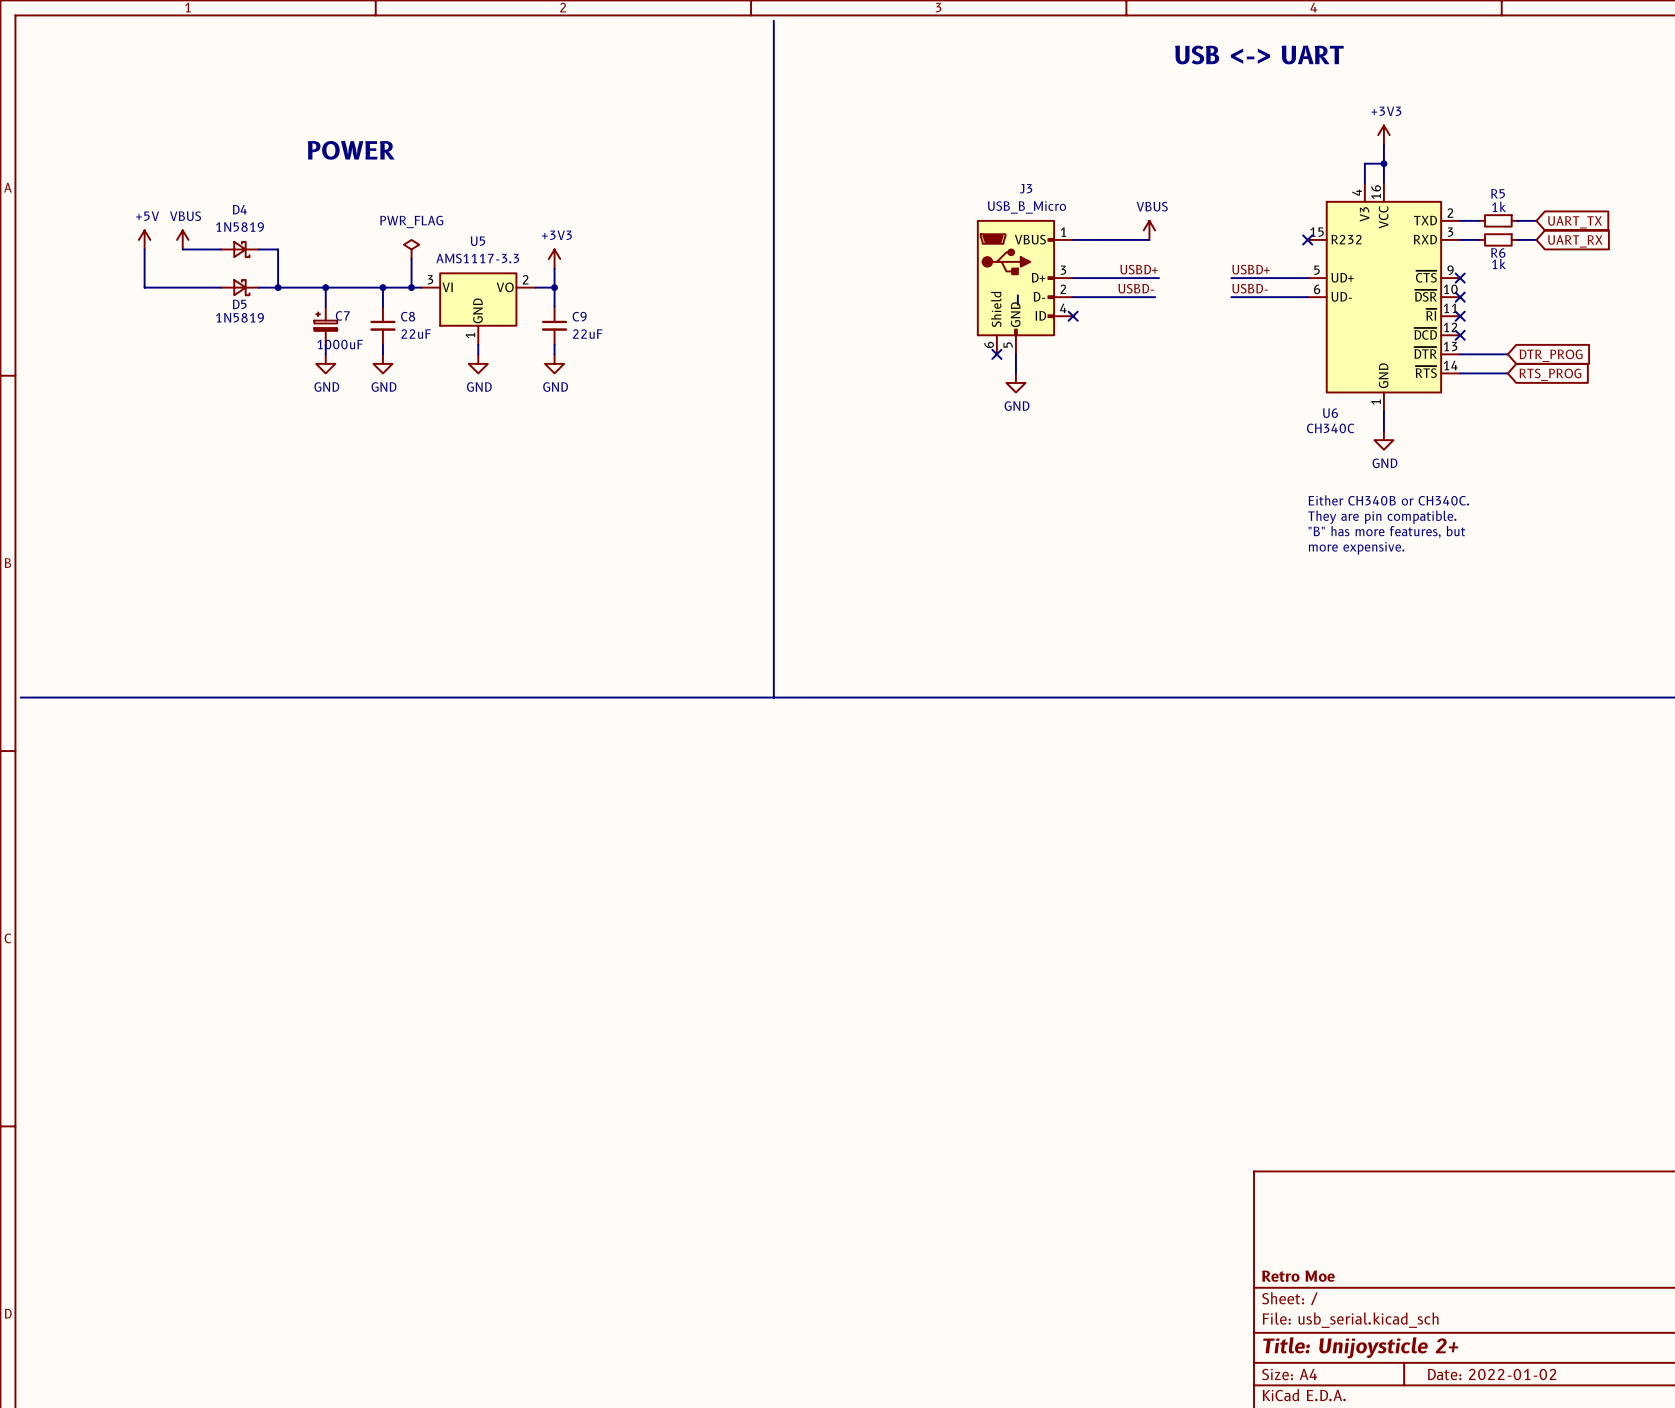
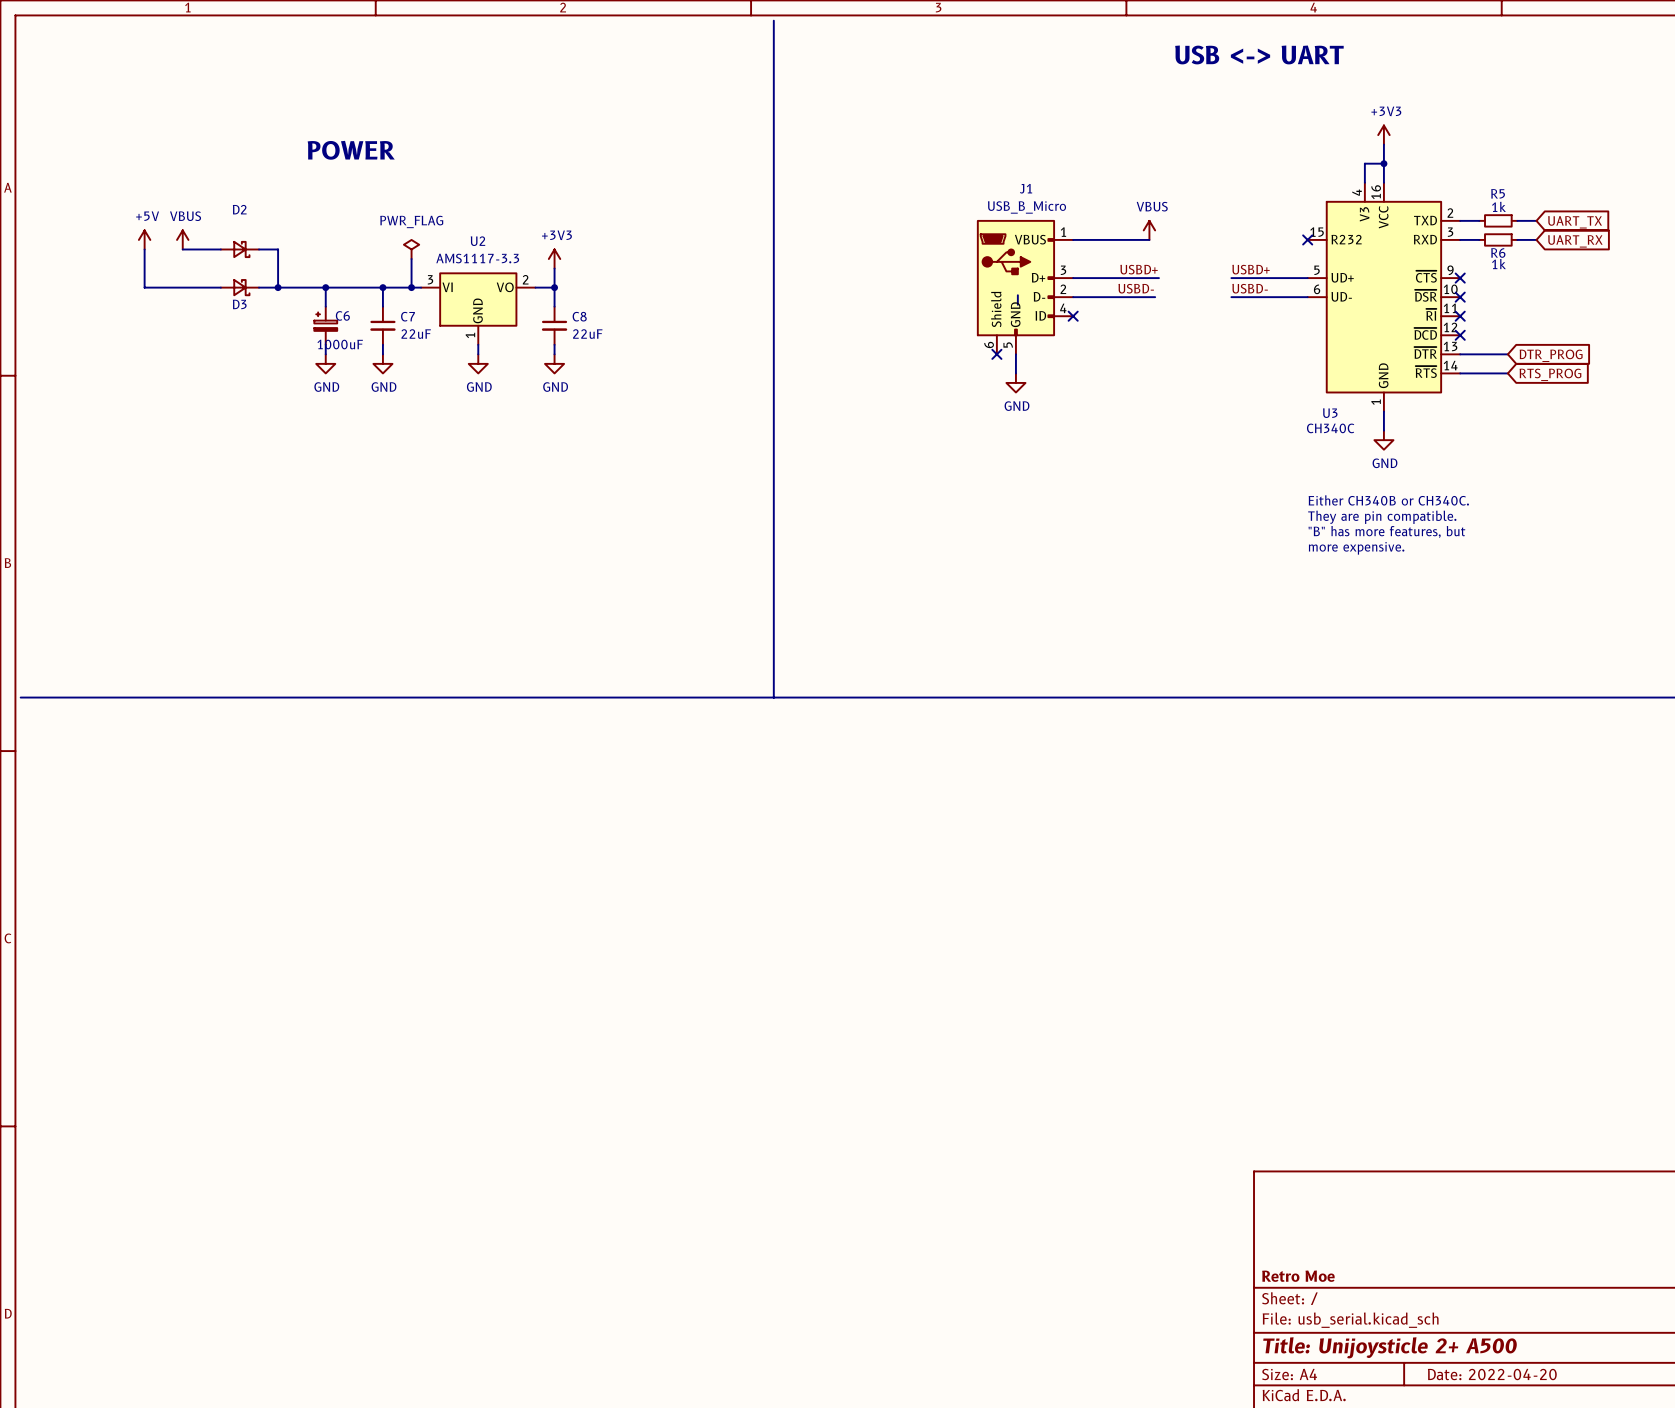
J3 name: J3 (1026, 188) -> J1 (1026, 188)
D4 name: D4 (239, 209) -> D2 (239, 209)
D4 value: 1N5819 (240, 227) -> none
U5 name: U5 (477, 241) -> U2 (477, 241)
D5 name: D5 (239, 304) -> D3 (239, 304)
C7 name: C7 (342, 315) -> C6 (342, 315)
C8 name: C8 (408, 316) -> C7 (407, 316)
C9 name: C9 (579, 316) -> C8 (579, 316)
D5 value: 1N5819 (240, 317) -> none
U6 name: U6 (1330, 413) -> U3 (1330, 413)
title block: Title: Unijoysticle 2+ (1360, 1347) -> Title: Unijoysticle 2+ A500 (1390, 1347)
title block: Date: 2022-01-02 (1492, 1374) -> Date: 2022-04-20 (1492, 1374)

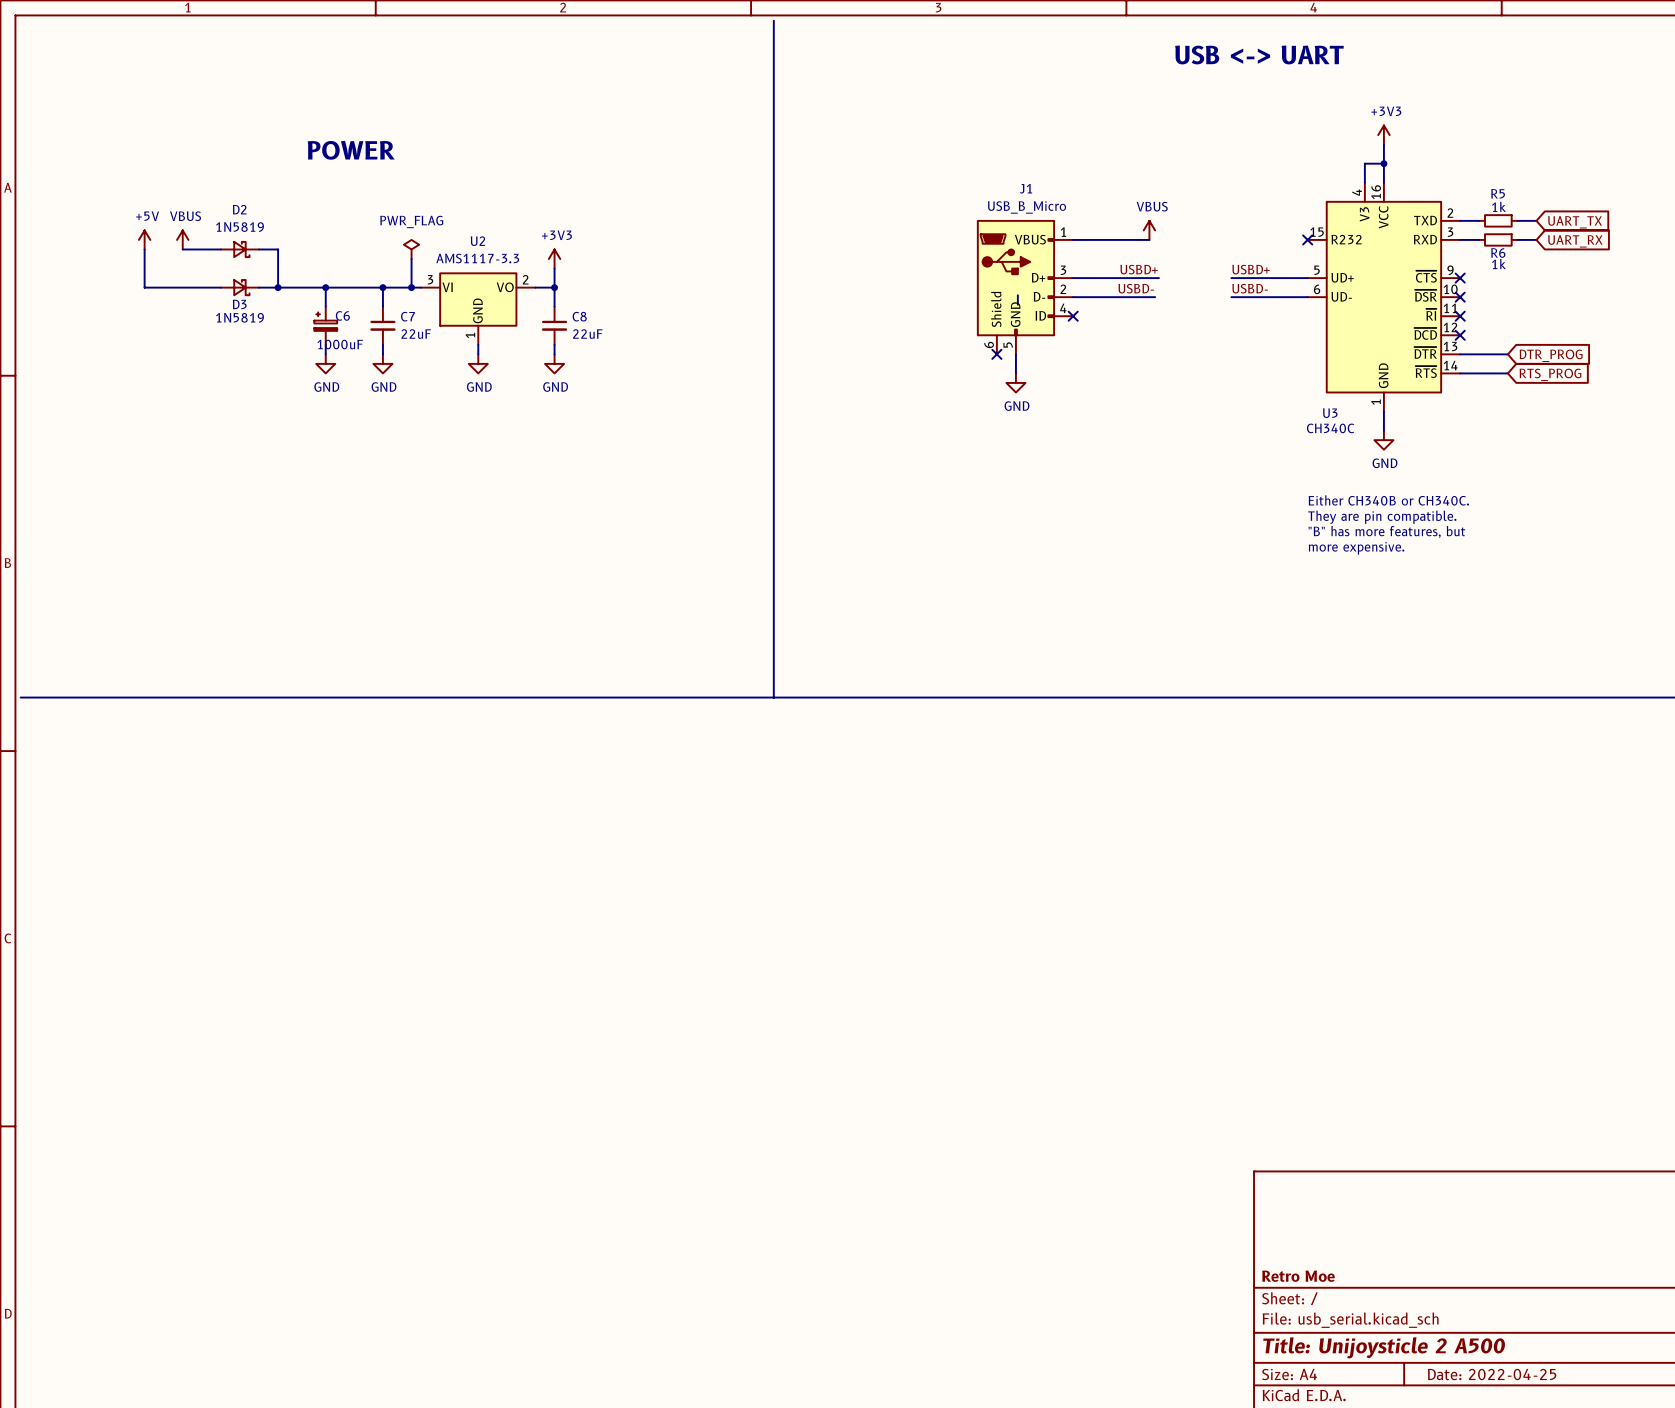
D2 value: none -> 1N5819 (240, 227)
D3 value: none -> 1N5819 (240, 317)
title block: Title: Unijoysticle 2+ A500 (1390, 1347) -> Title: Unijoysticle 2 A500 (1384, 1347)
title block: Date: 2022-04-20 (1492, 1374) -> Date: 2022-04-25 (1492, 1374)

